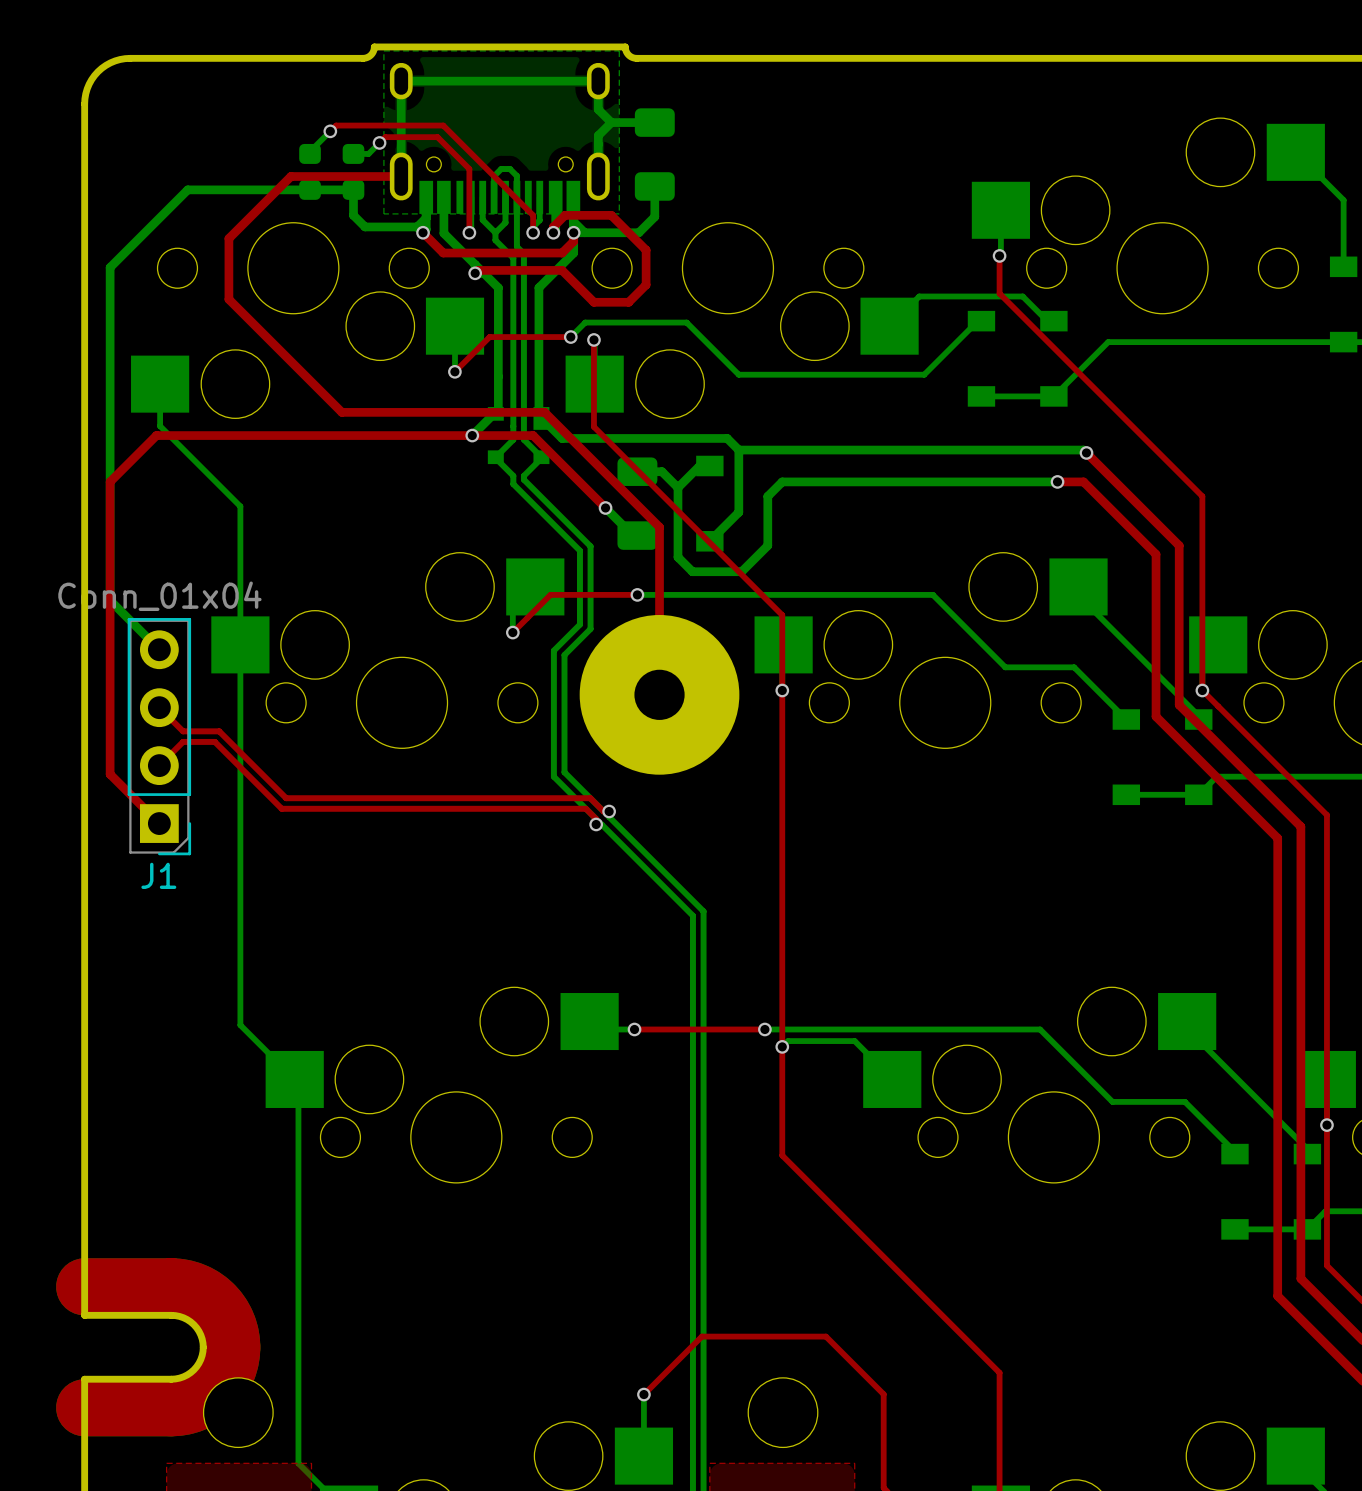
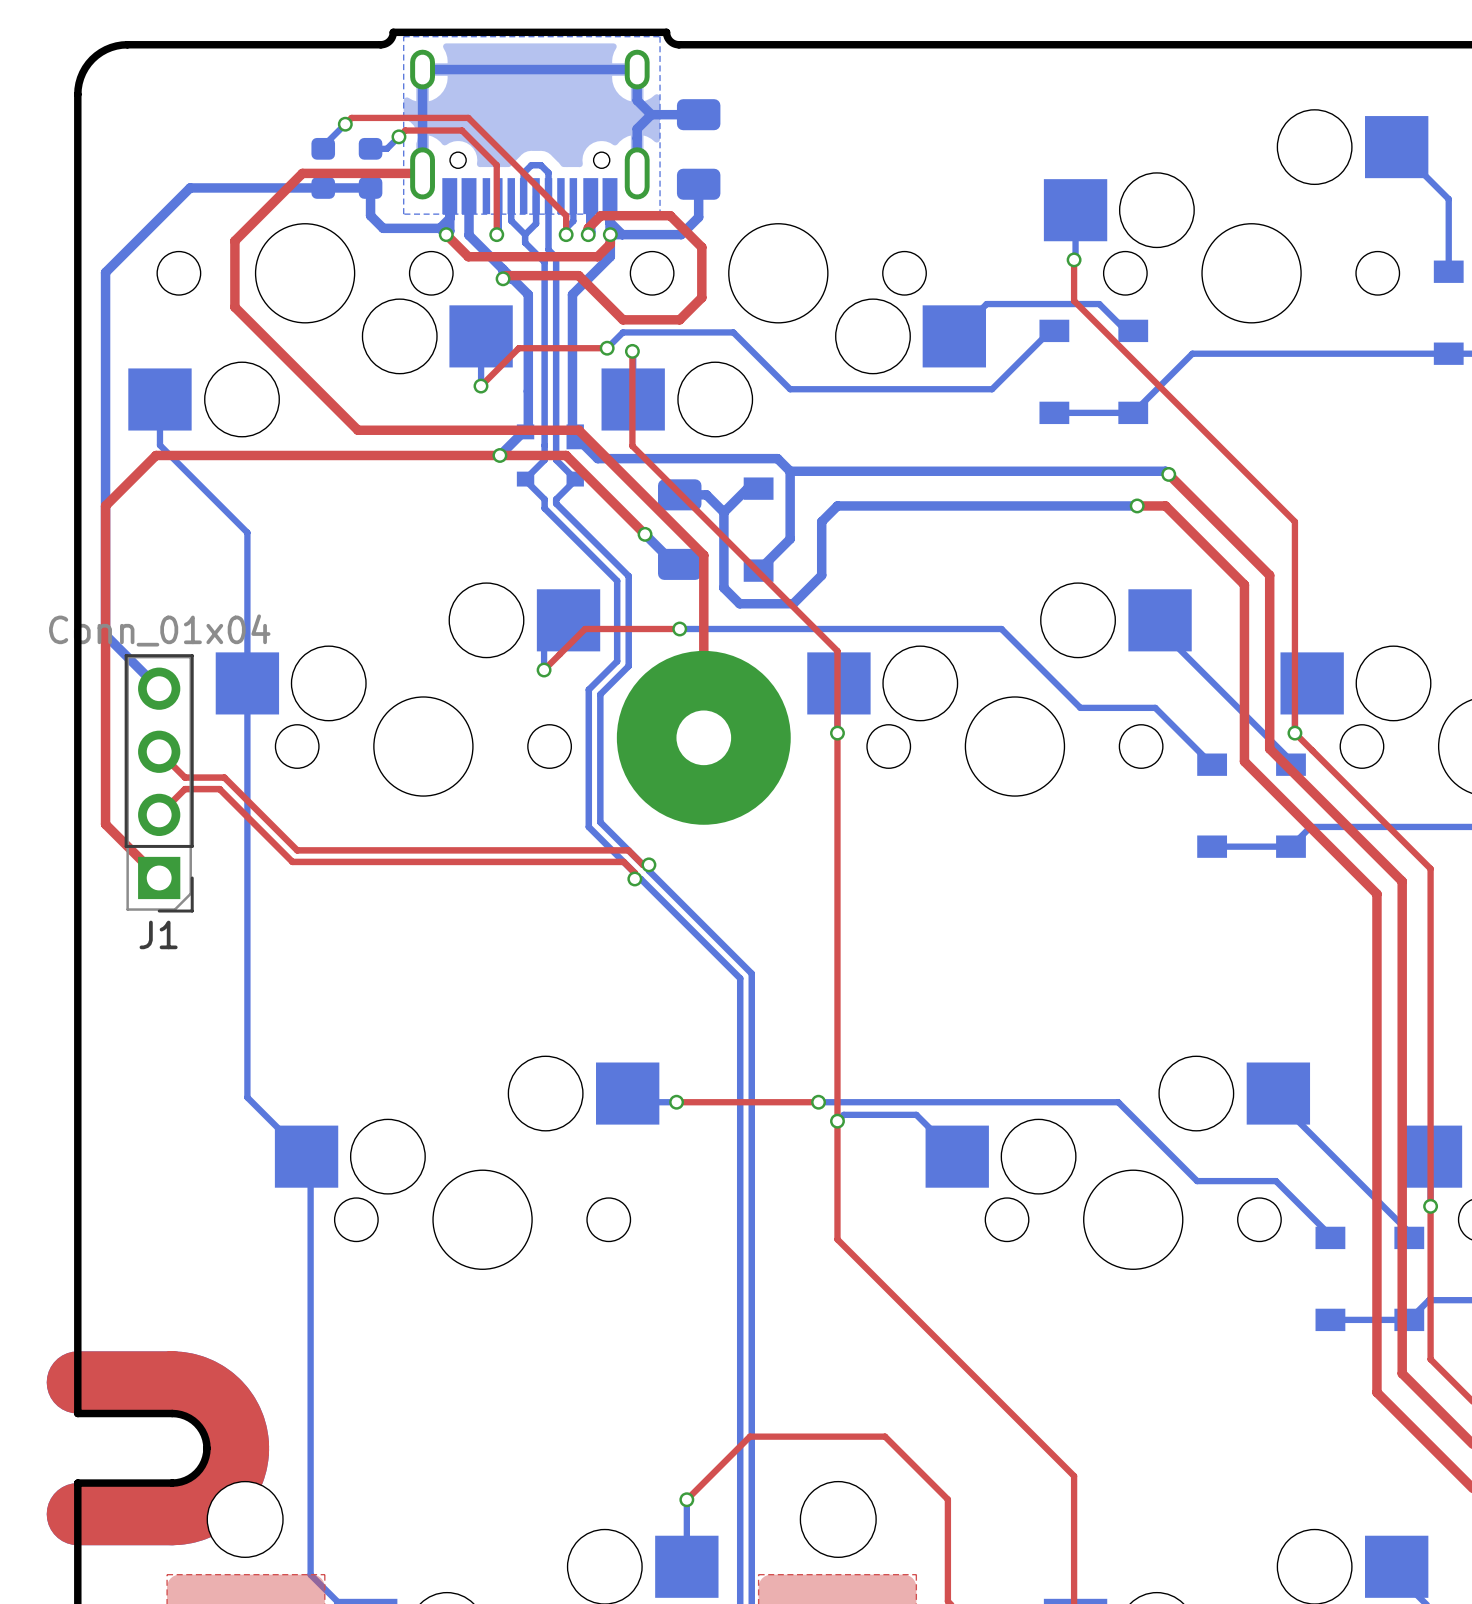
top track: (611, 215) (646, 250) (646, 284) (628, 302) (593, 302) (562, 270) (544, 270) -> (651, 215) (670, 215) (701, 247) (701, 297) (679, 319) (622, 319) (578, 275)

